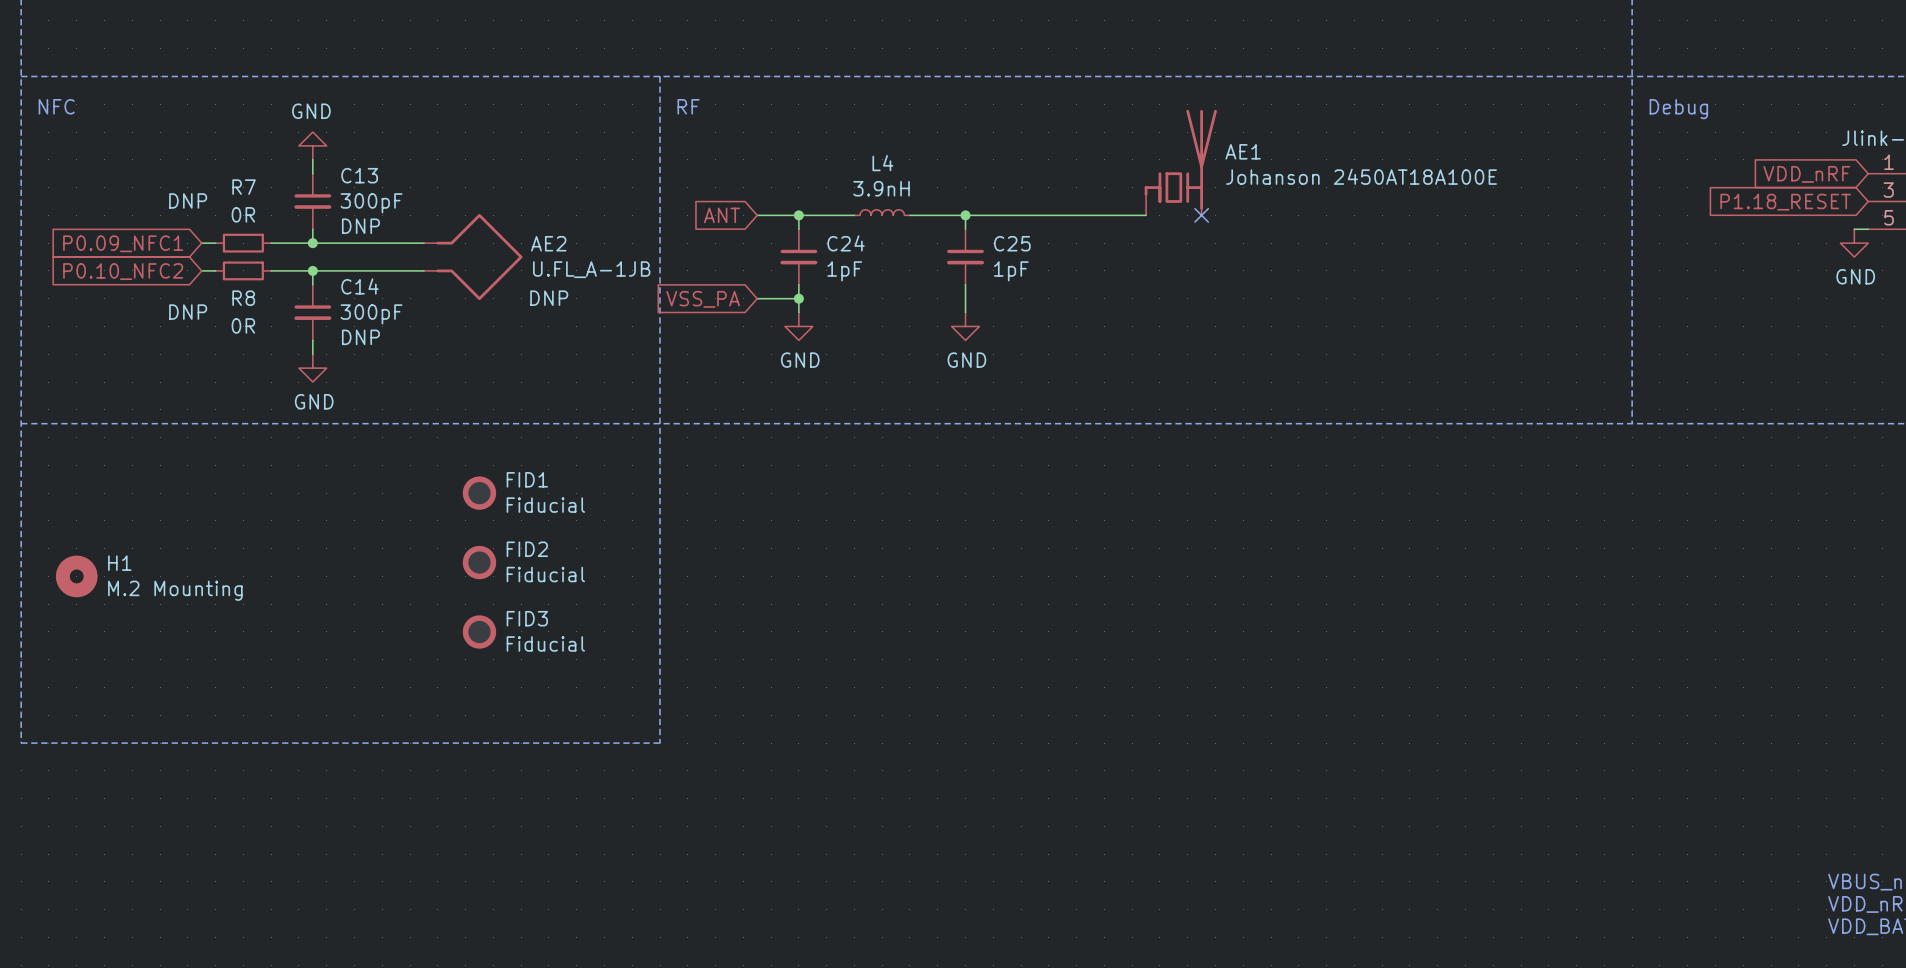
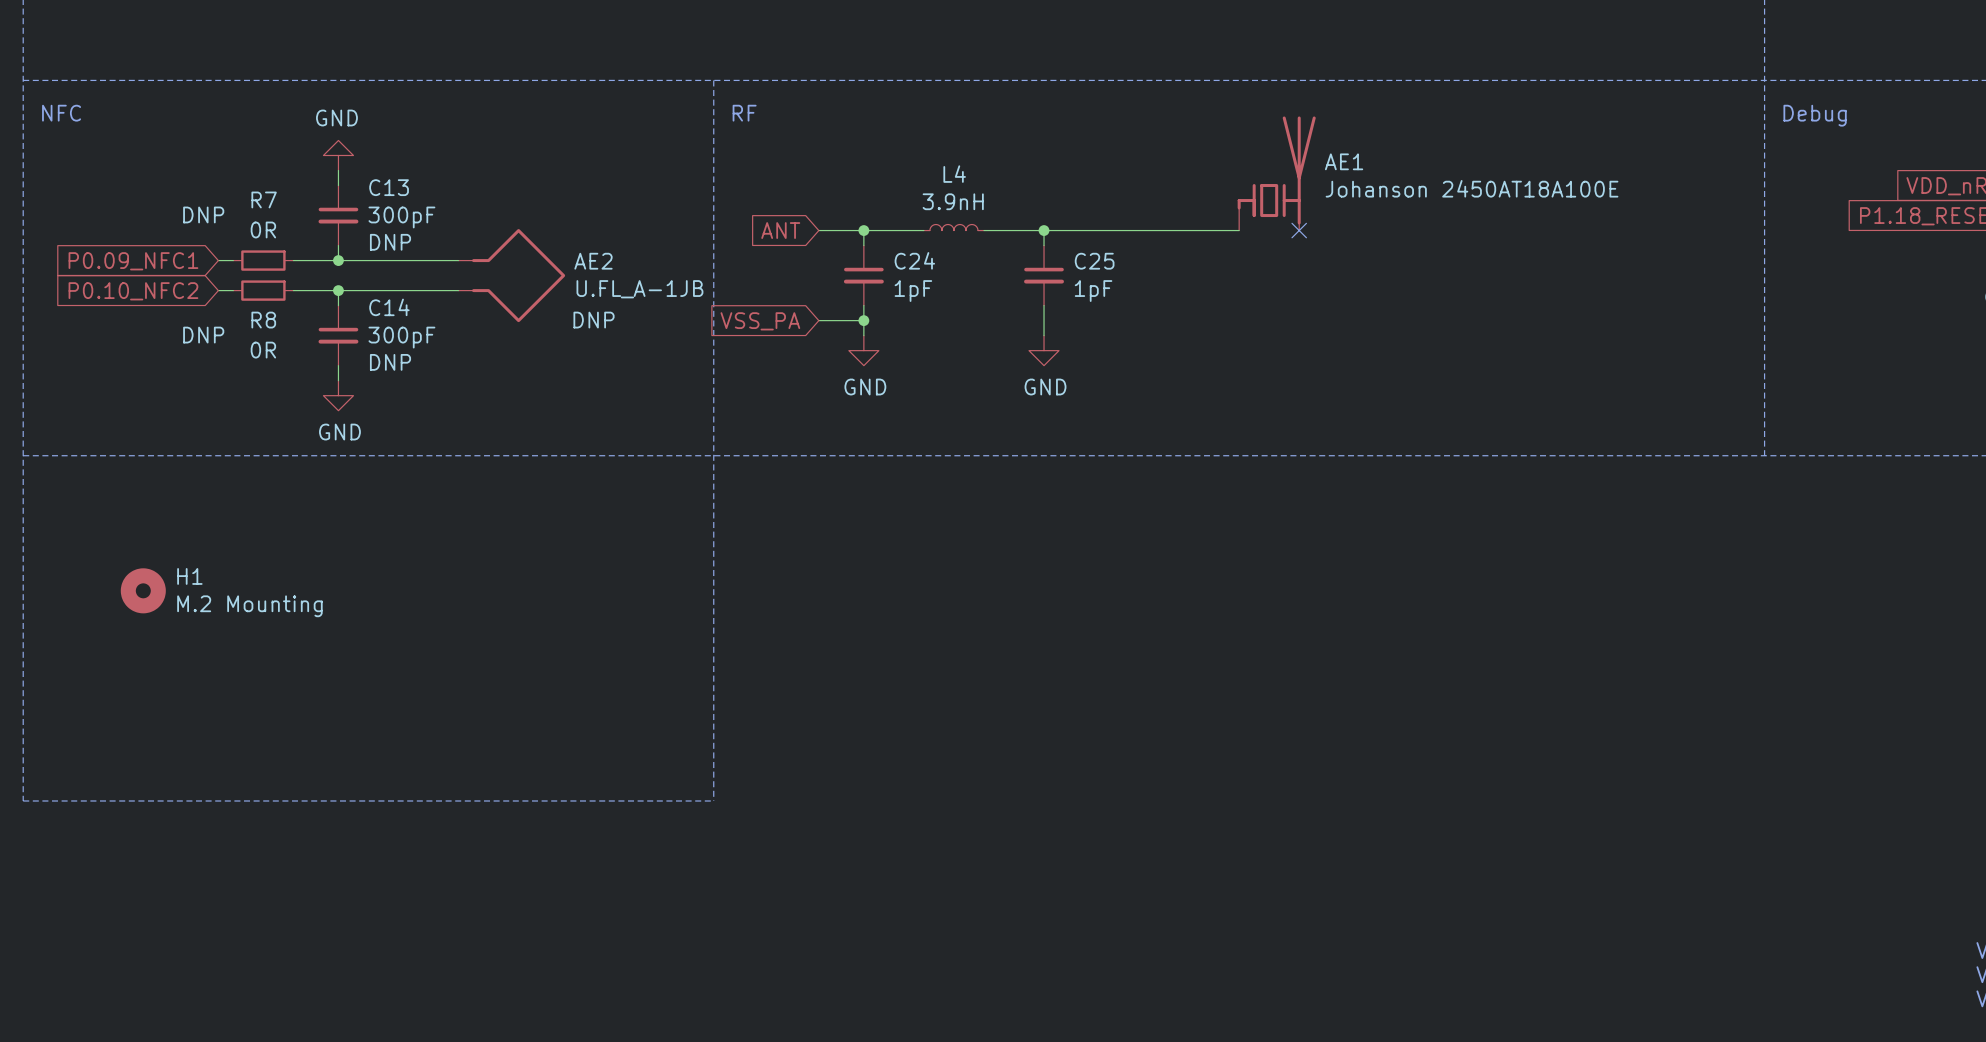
FID1: Fiducial (479, 493) -> none
FID2: Fiducial (479, 562) -> none
H1 position: (76, 576) -> (143, 590)
FID3: Fiducial (479, 631) -> none

